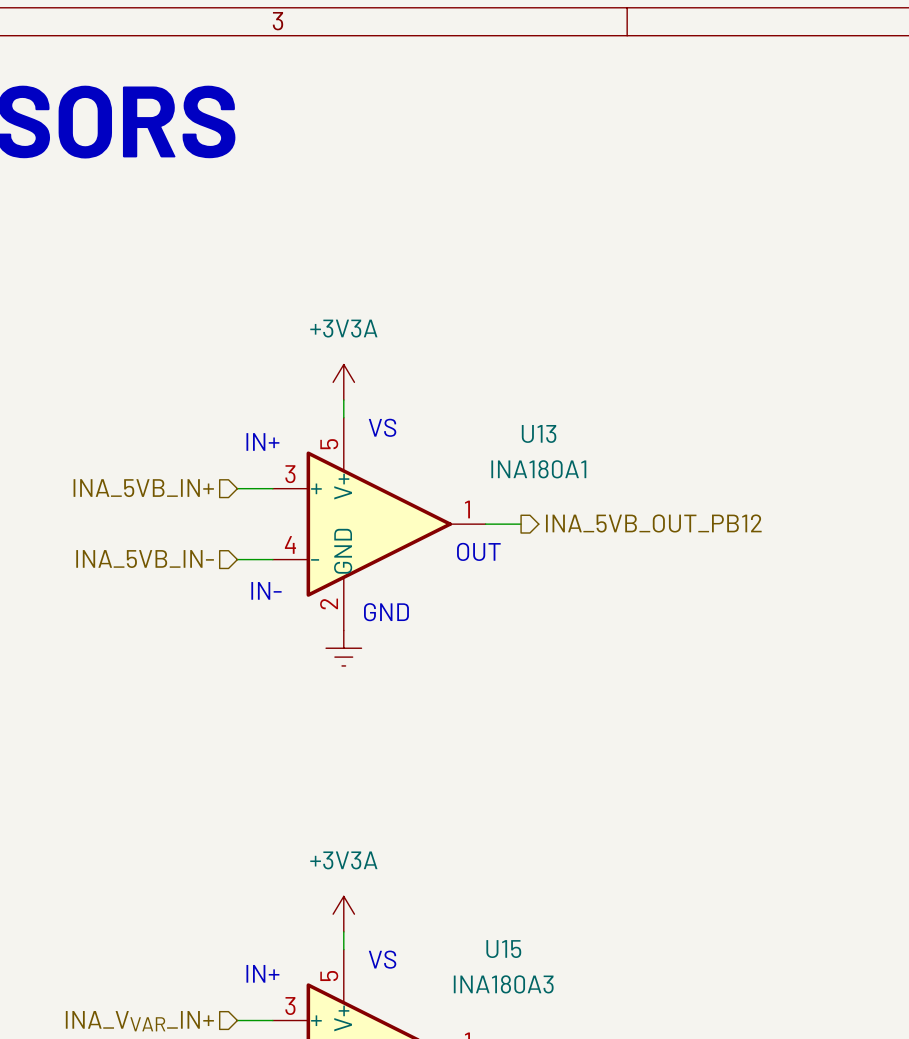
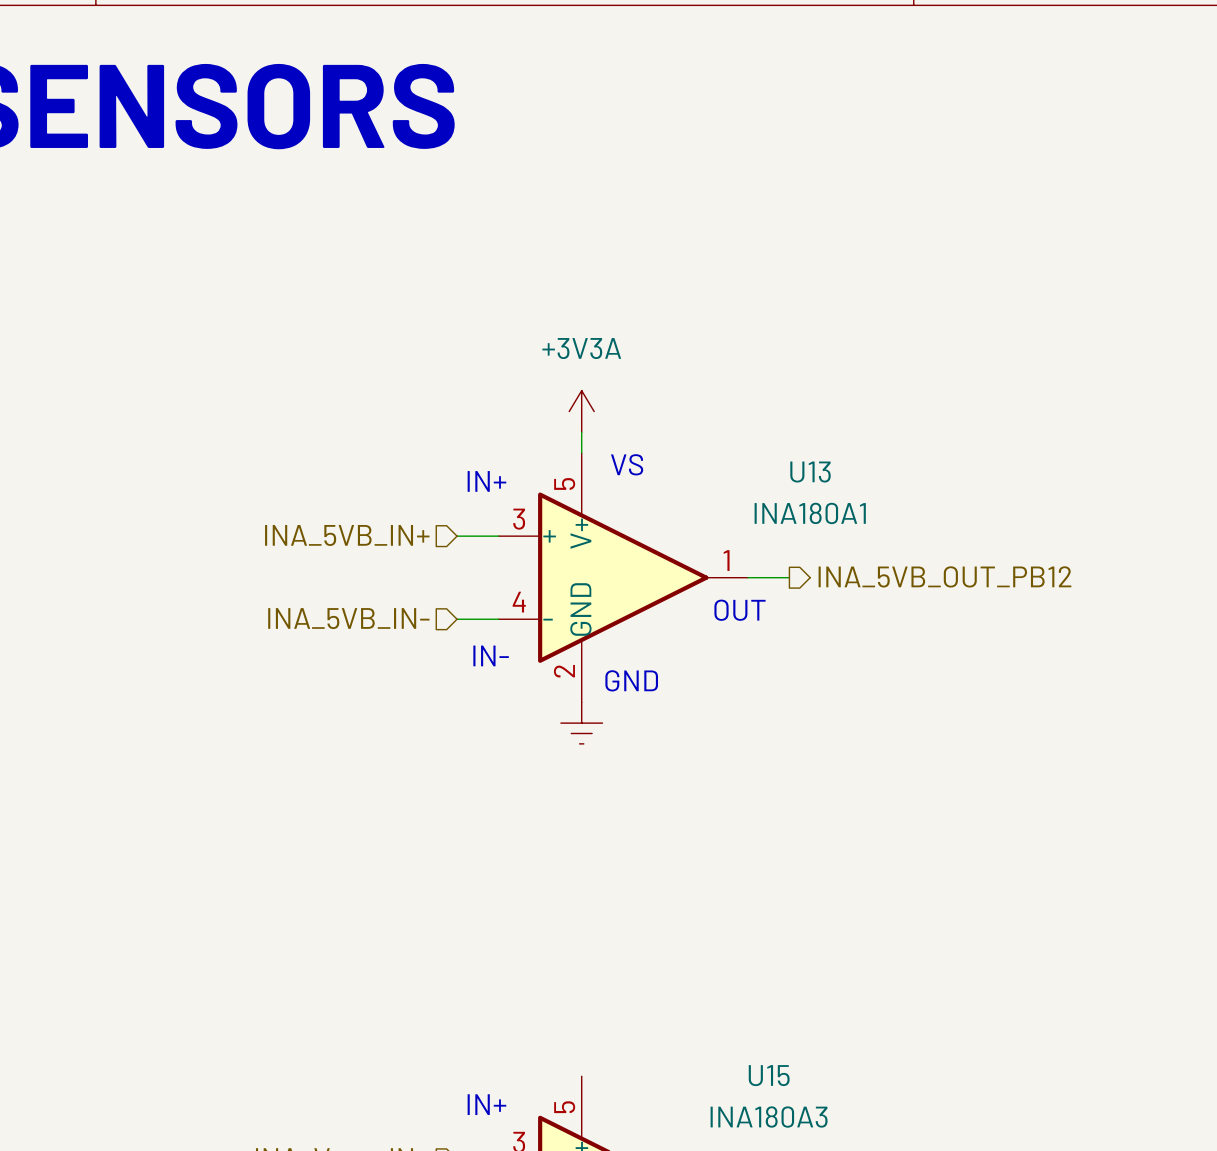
power symbol: +3V3A (343, 914) -> none
wire: (343, 931) (343, 949) -> none
text: VS (382, 959) -> none

